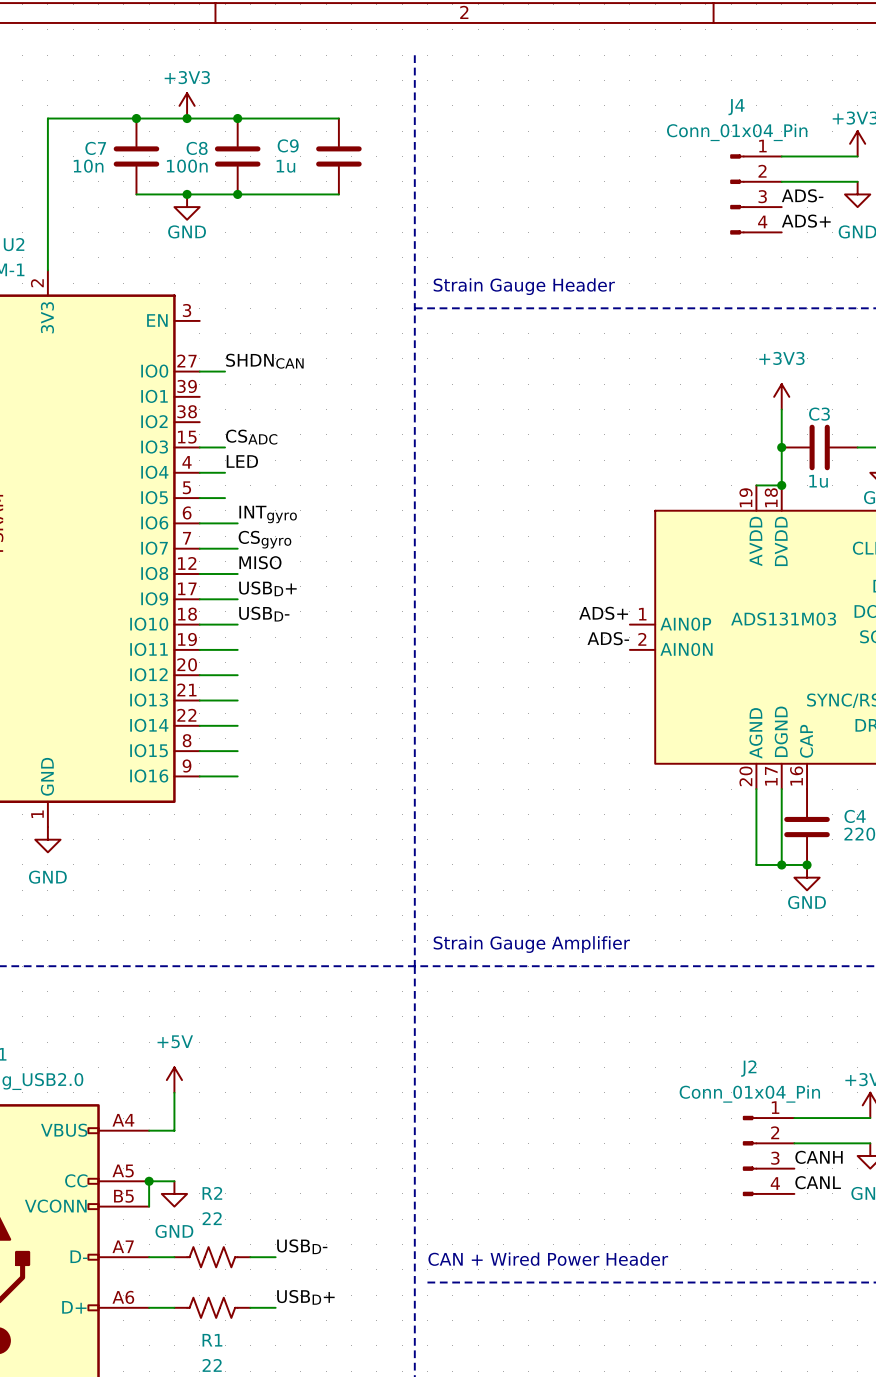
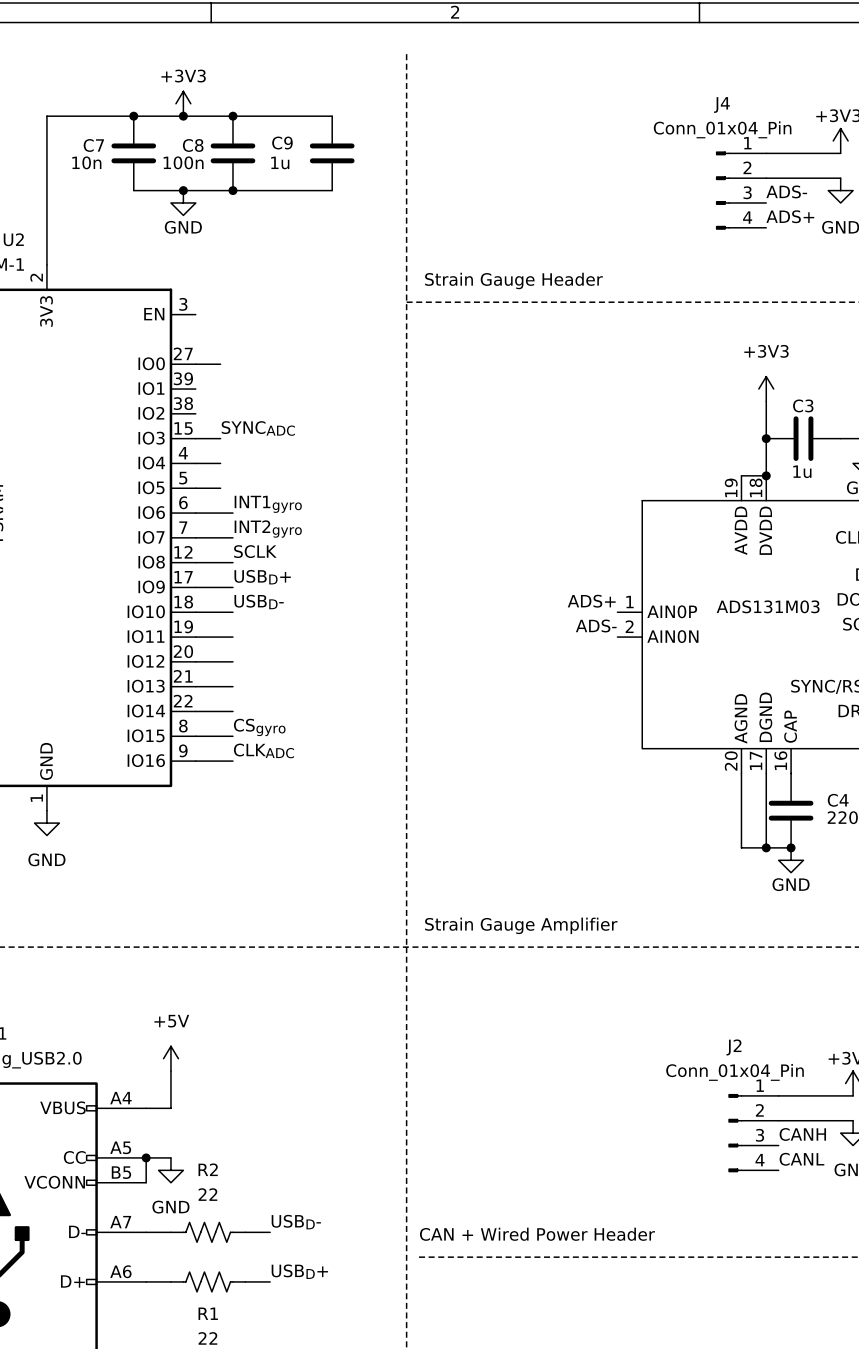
label: SHDNCAN (264, 361) -> none
label: CSADC (251, 437) -> SYNCADC (258, 428)
label: LED (242, 461) -> none
label: INTgyro (268, 514) -> INT1gyro (268, 504)
label: CSgyro (264, 539) -> INT2gyro (268, 529)
label: MISO (260, 562) -> SCLK (255, 551)
label: none -> CSgyro (259, 727)
label: none -> CLKADC (264, 750)

